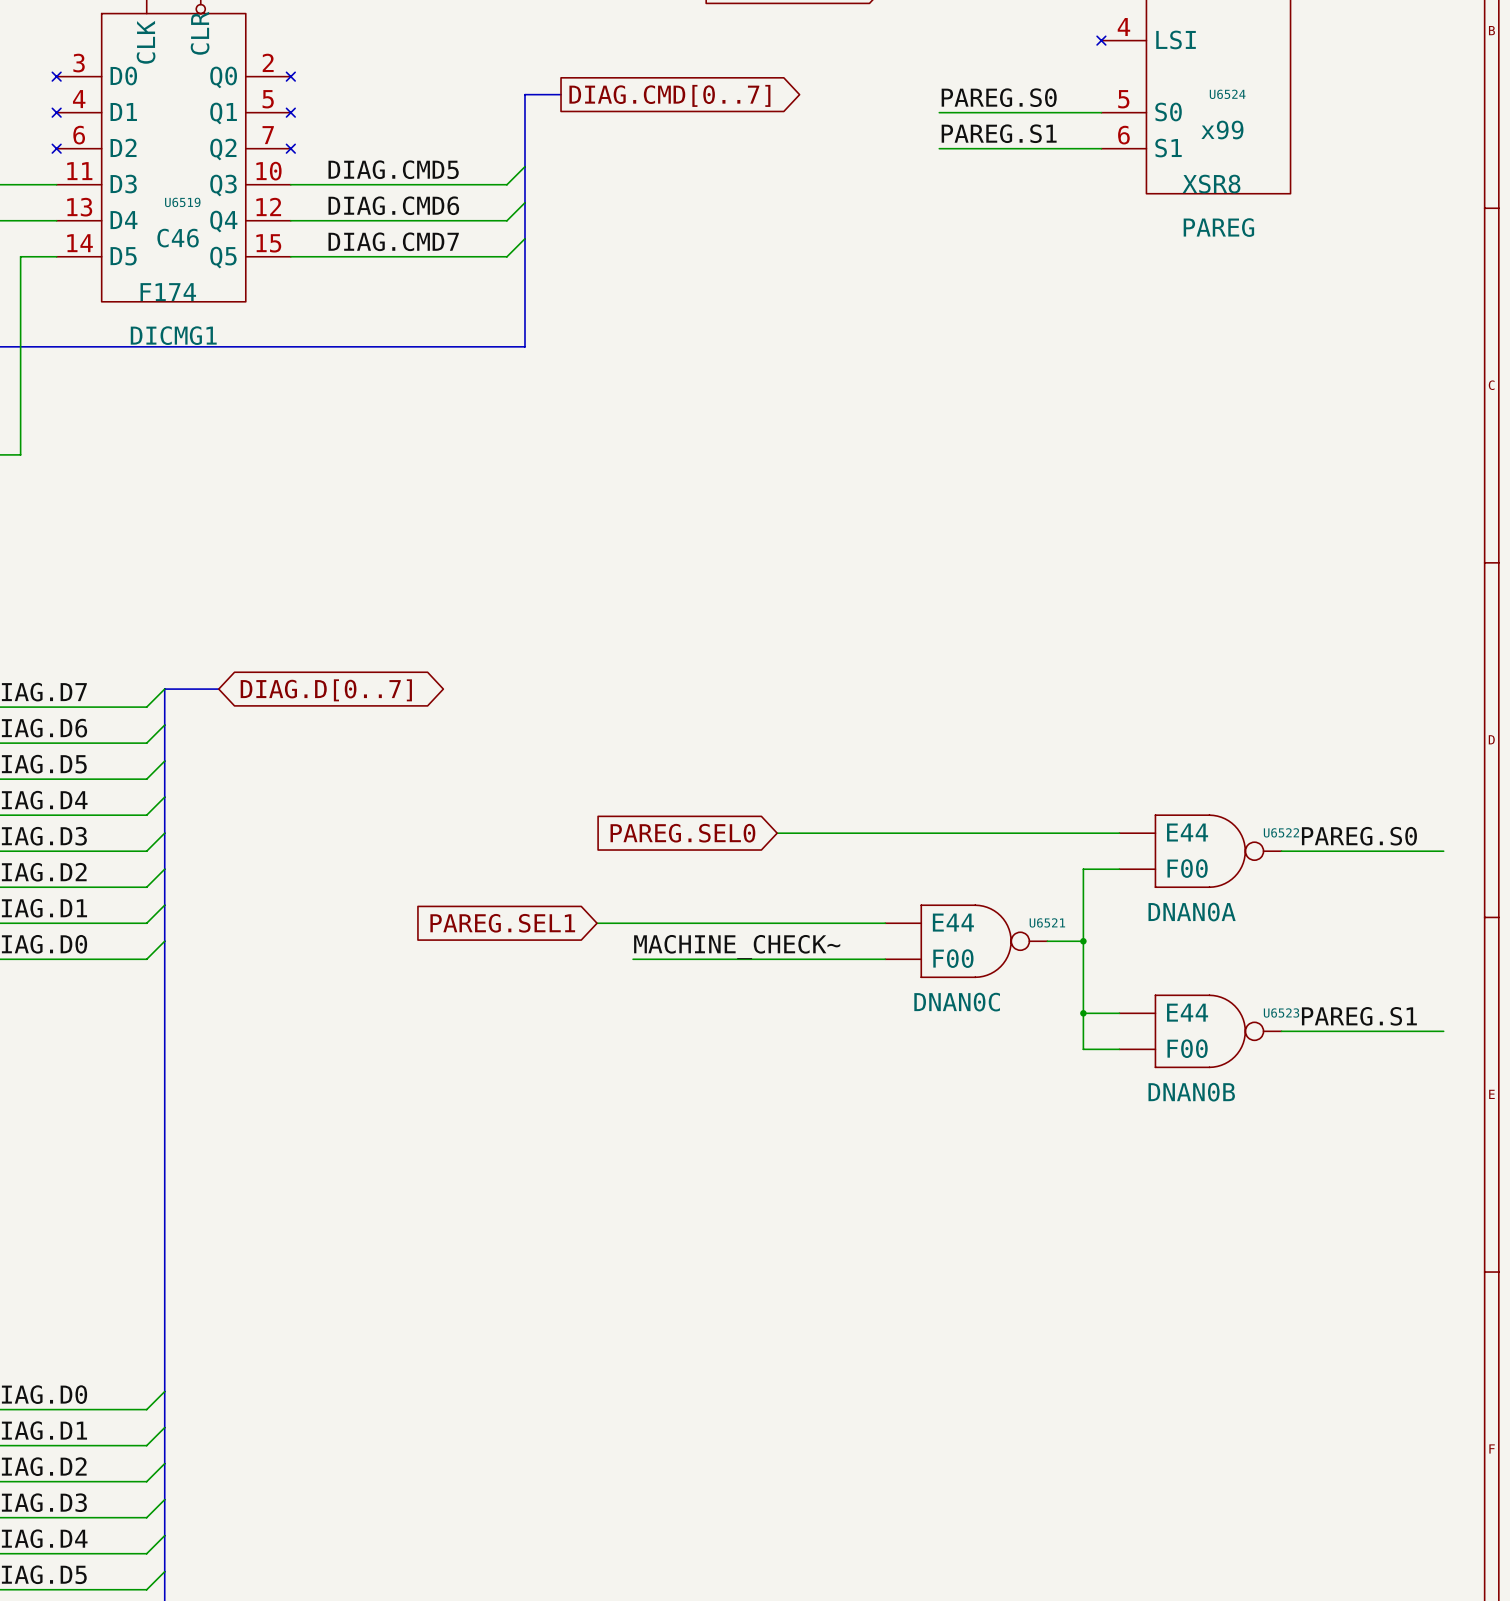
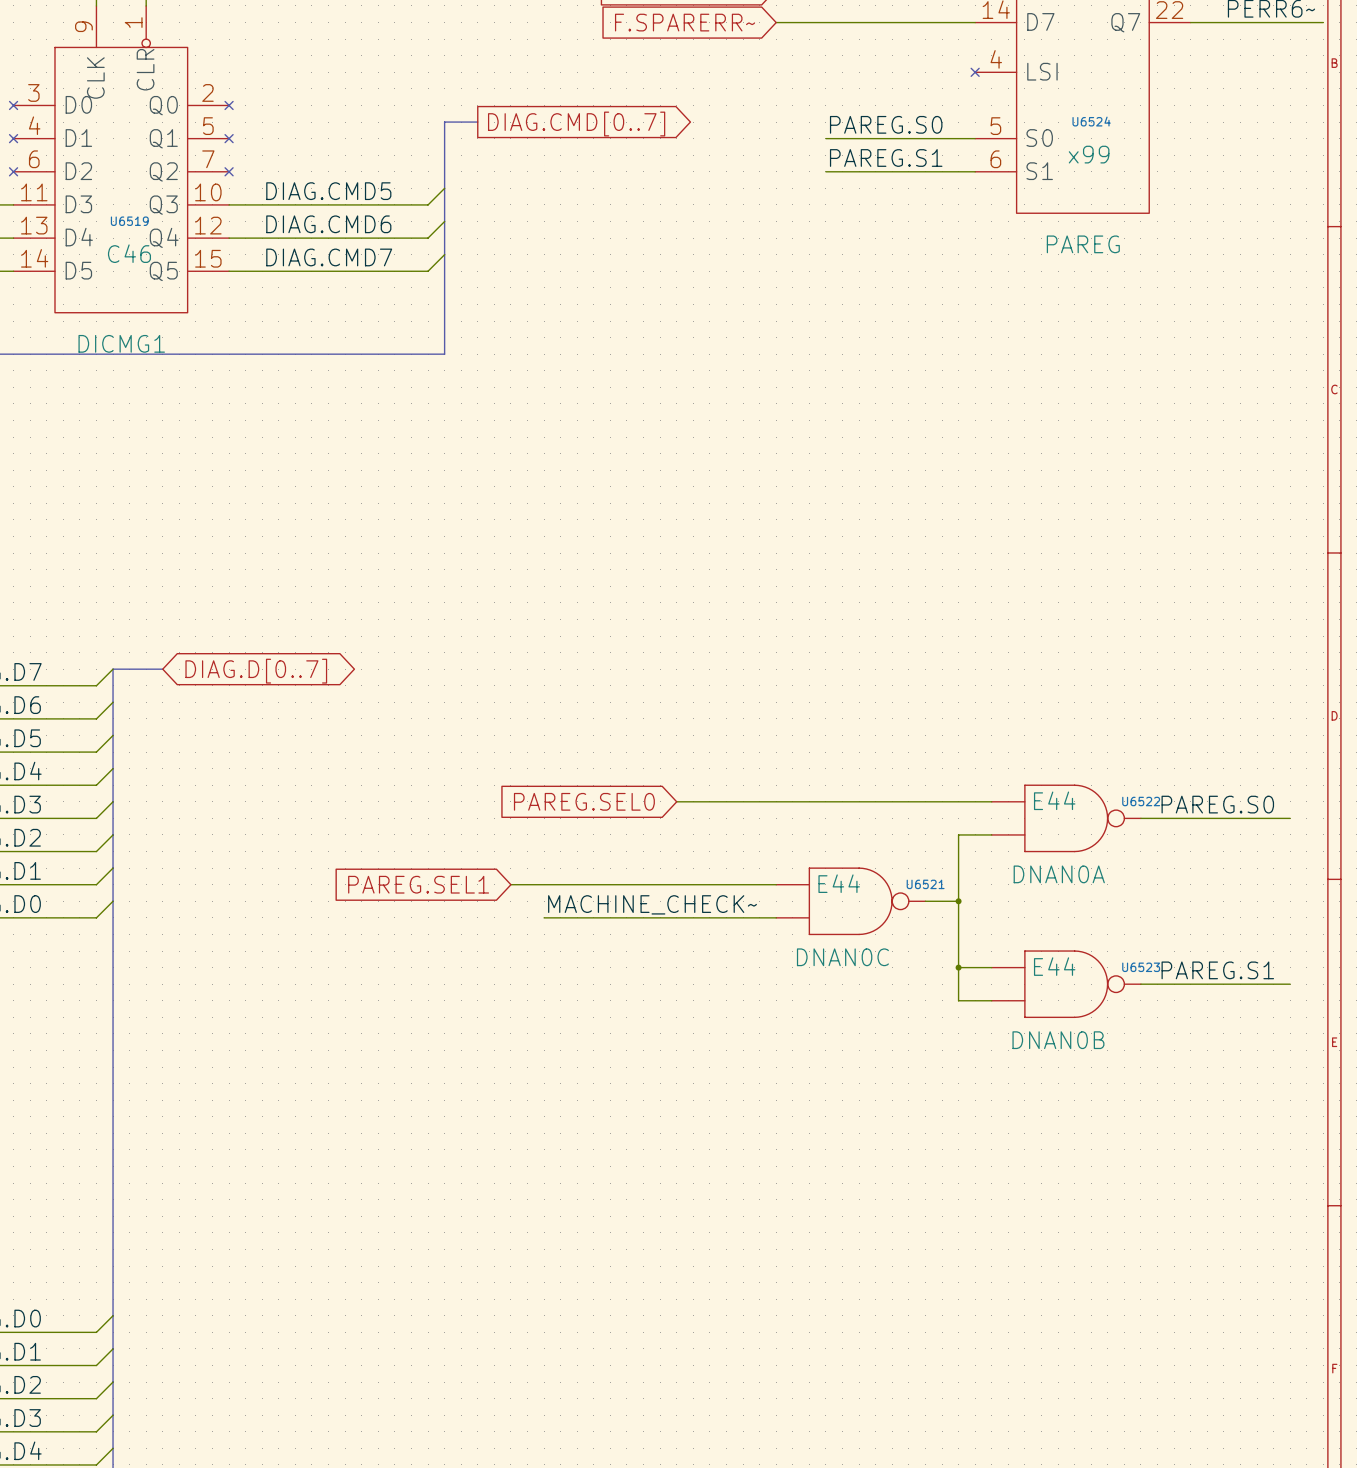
U6524 value: XSR8 (1211, 184) -> none
U6519 value: F174 (168, 292) -> none
U6522 value: F00 (1187, 868) -> none
U6521 value: F00 (953, 958) -> none
U6523 value: F00 (1187, 1048) -> none

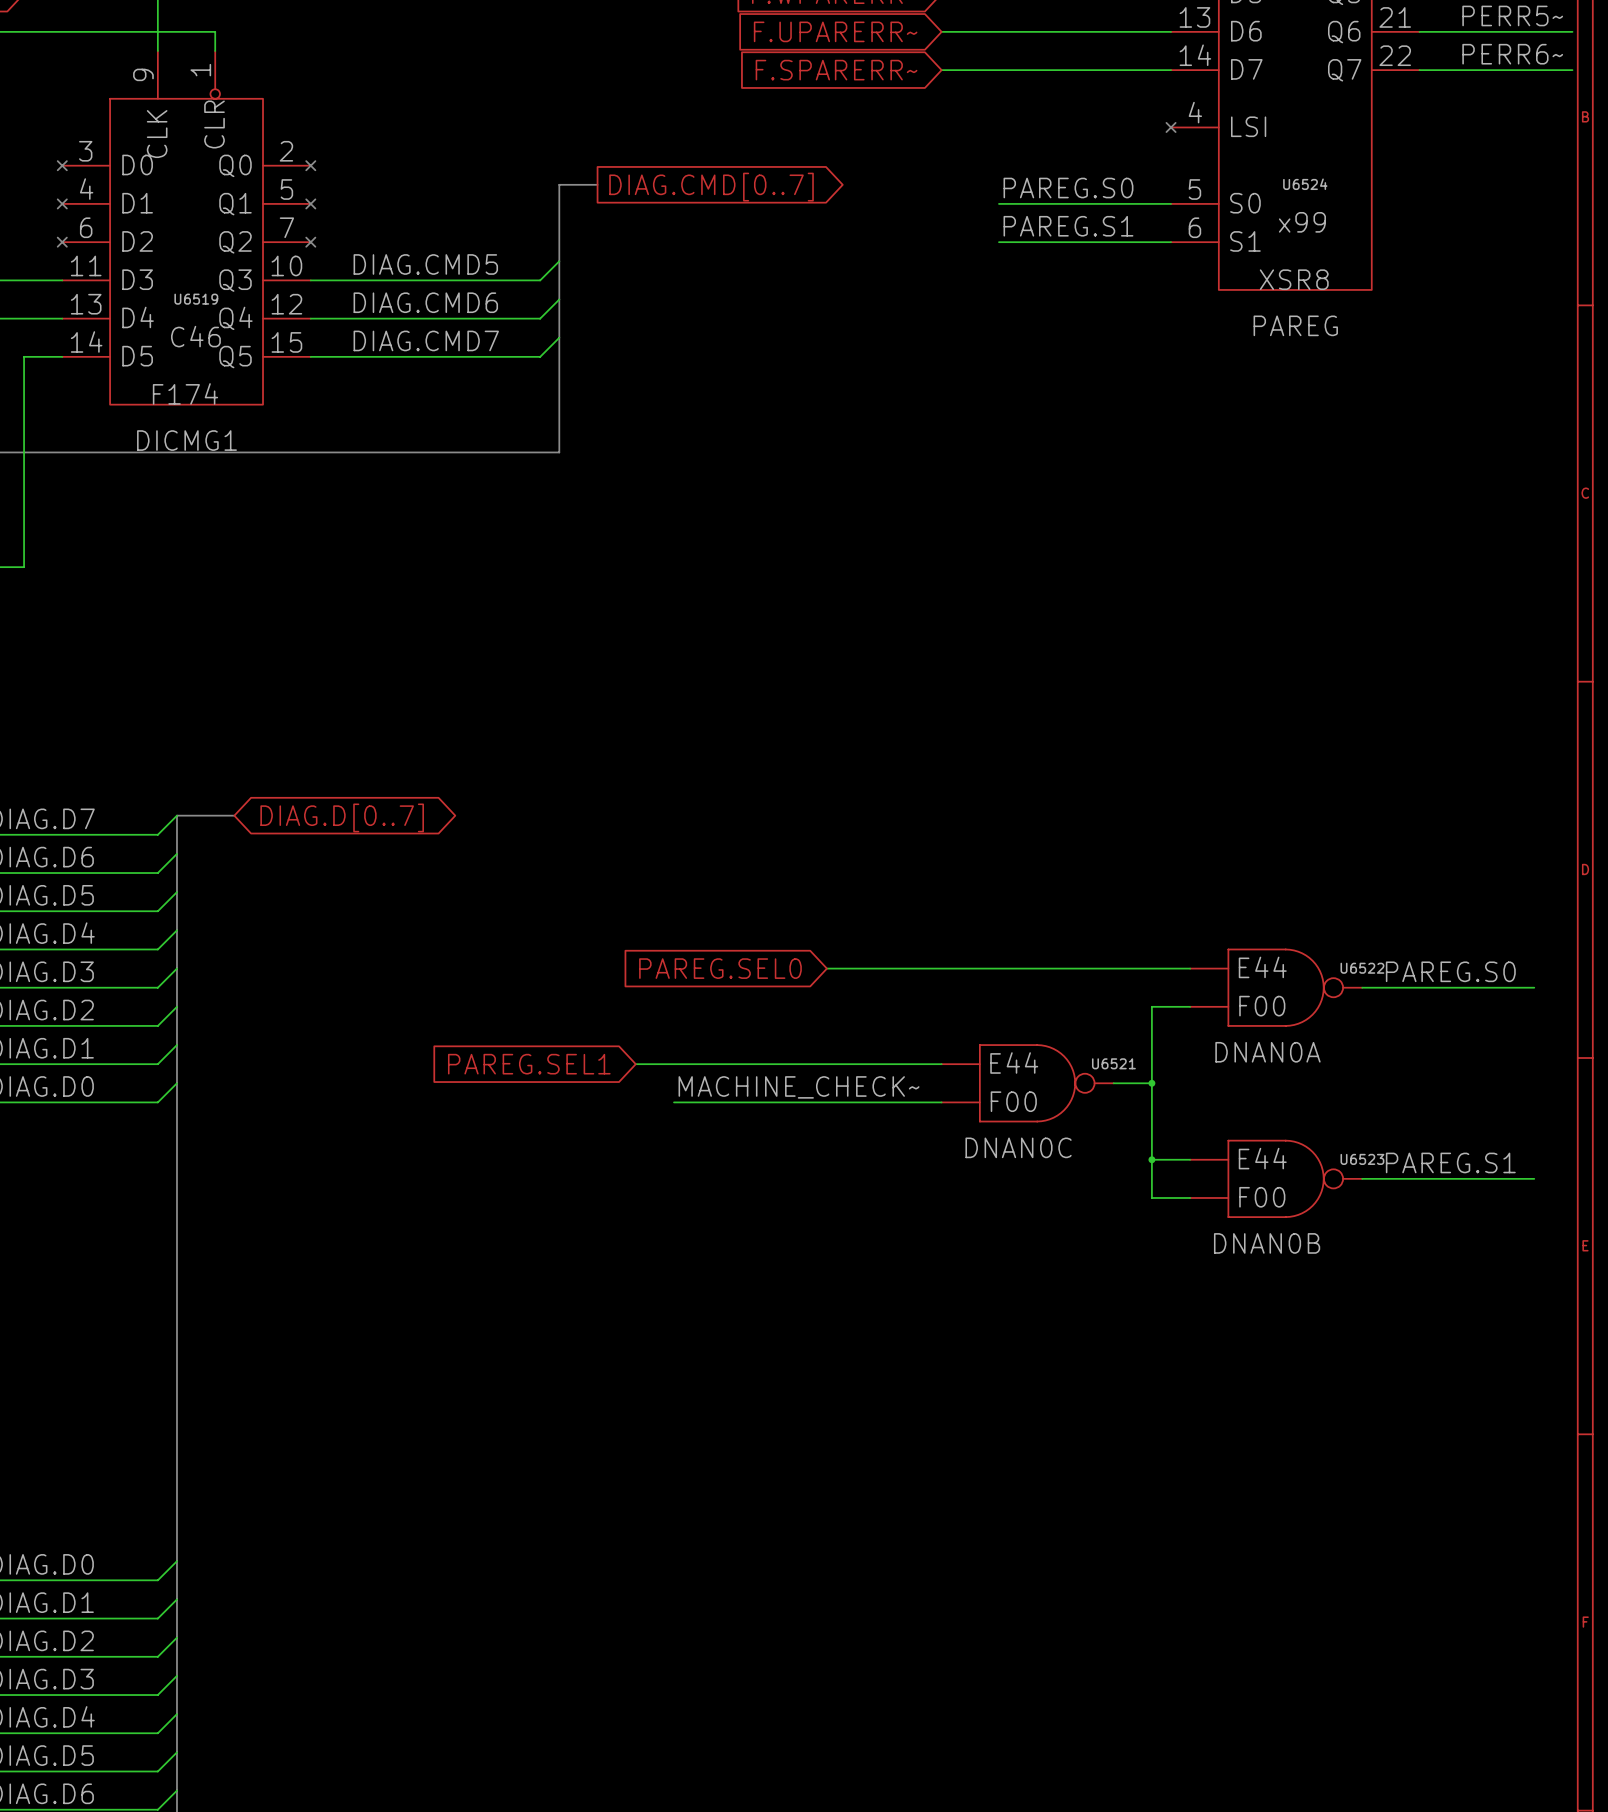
U6524 value: none -> XSR8 (1294, 279)
U6519 value: none -> F174 (185, 393)
U6522 value: none -> F00 (1262, 1006)
U6521 value: none -> F00 (1013, 1101)
U6523 value: none -> F00 (1262, 1197)

